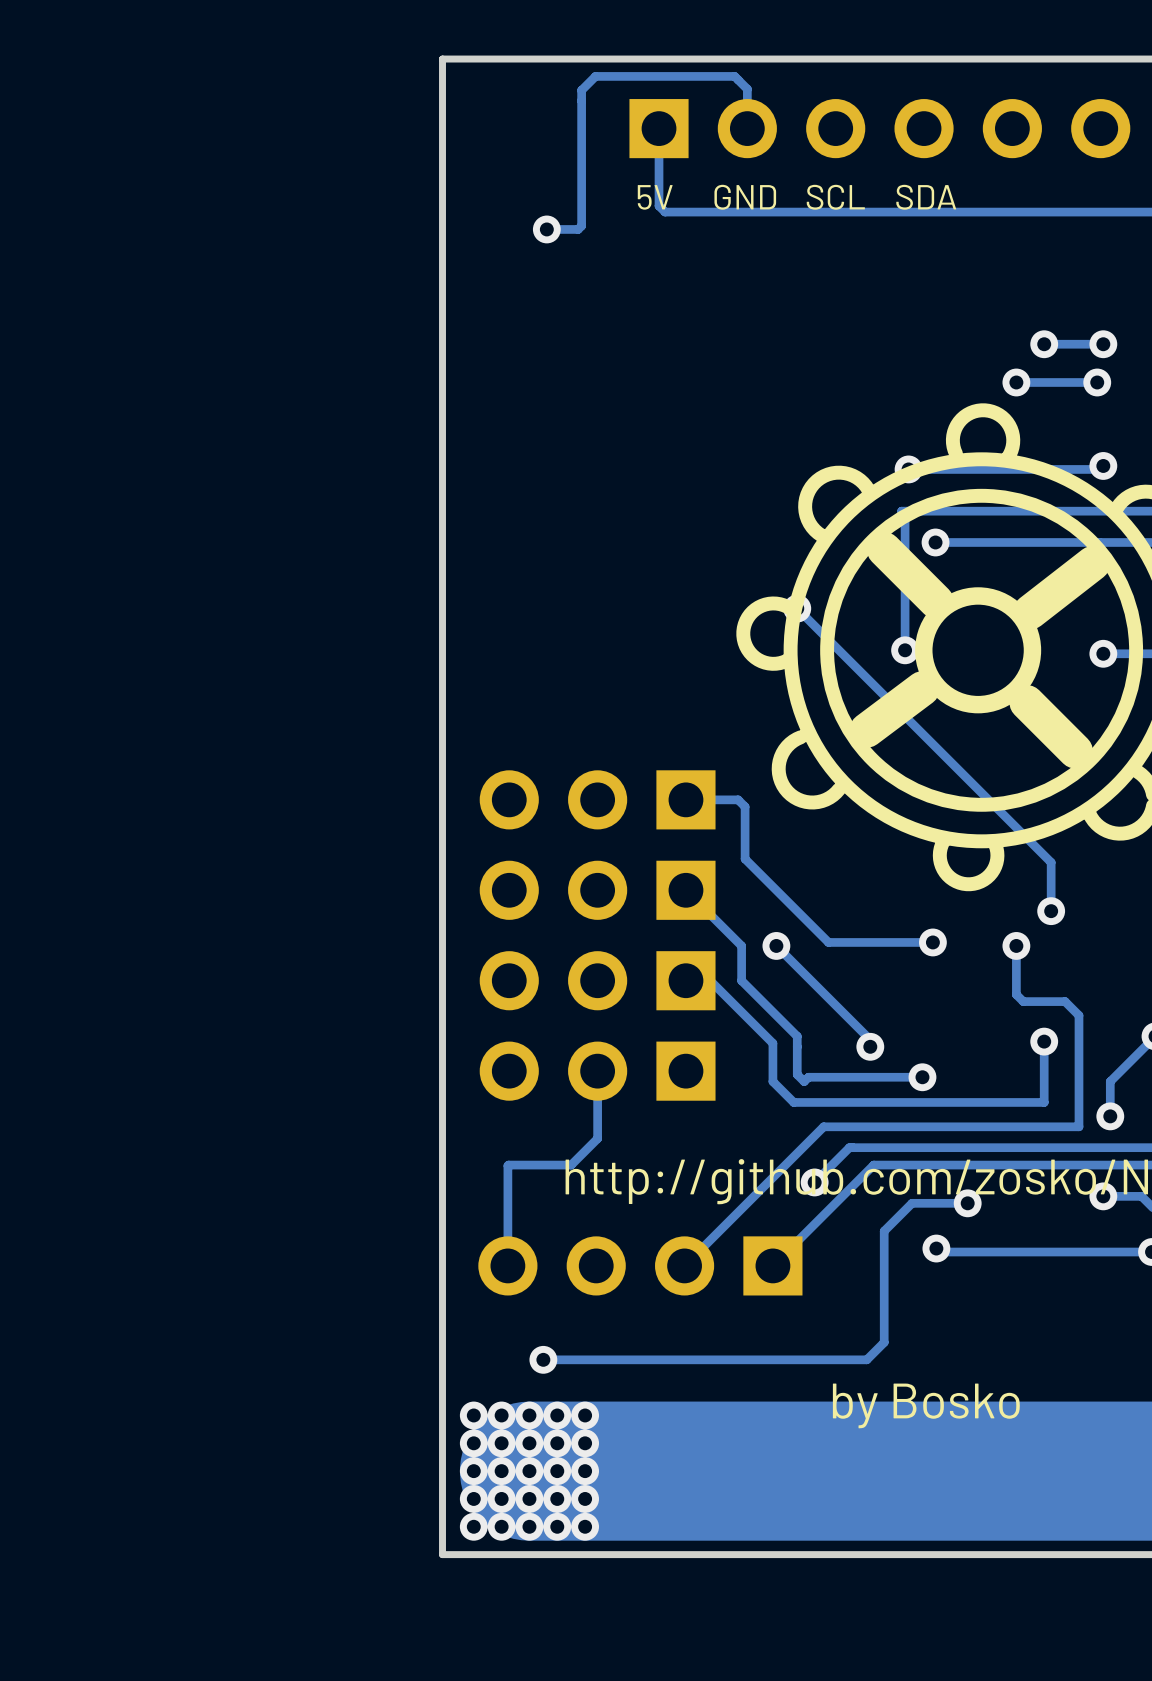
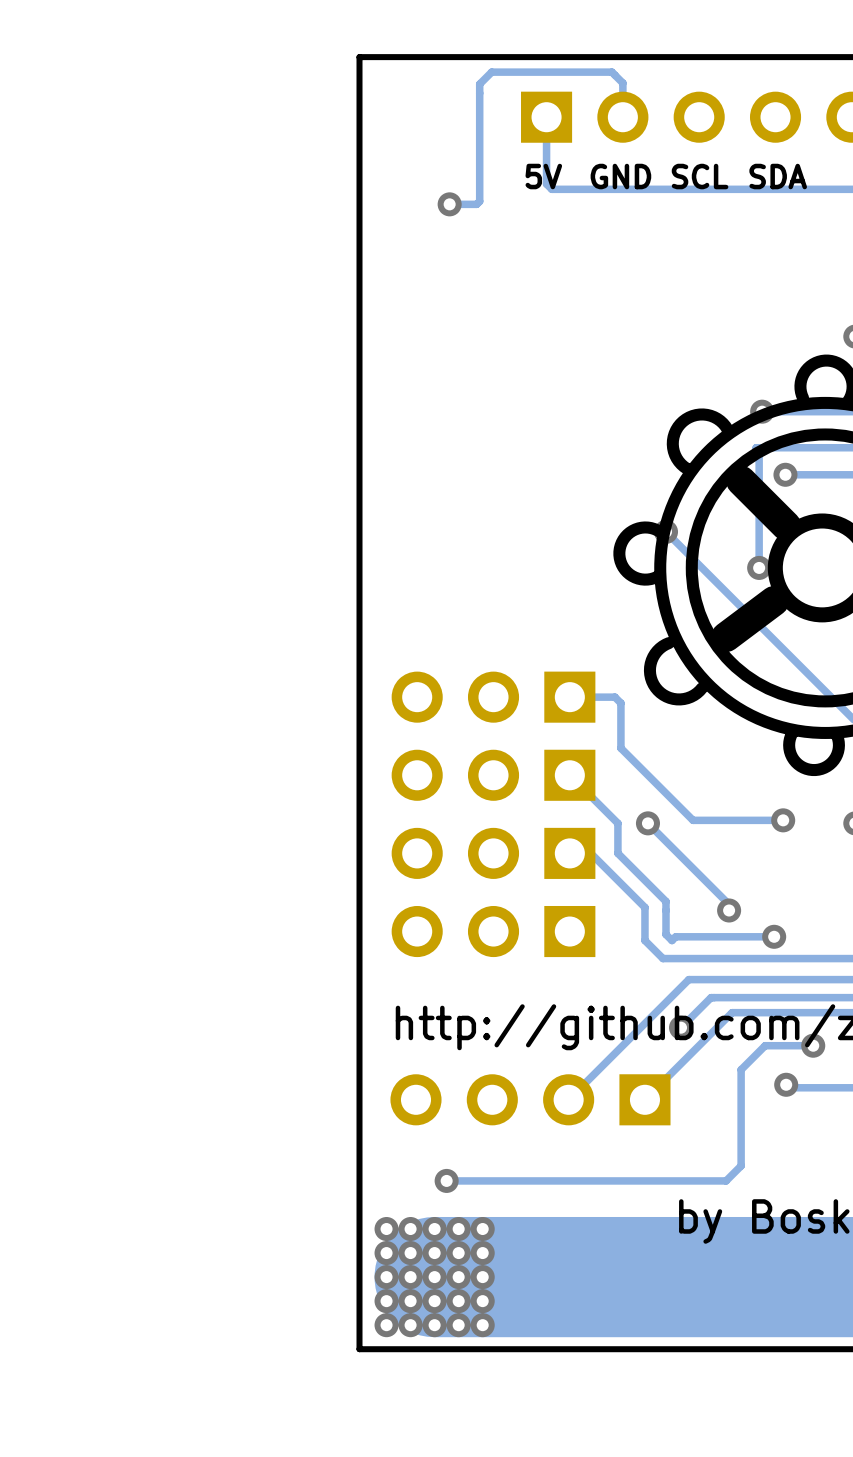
track: (597, 1071) (597, 1138) (571, 1165) (507, 1165) (507, 1265) -> none

